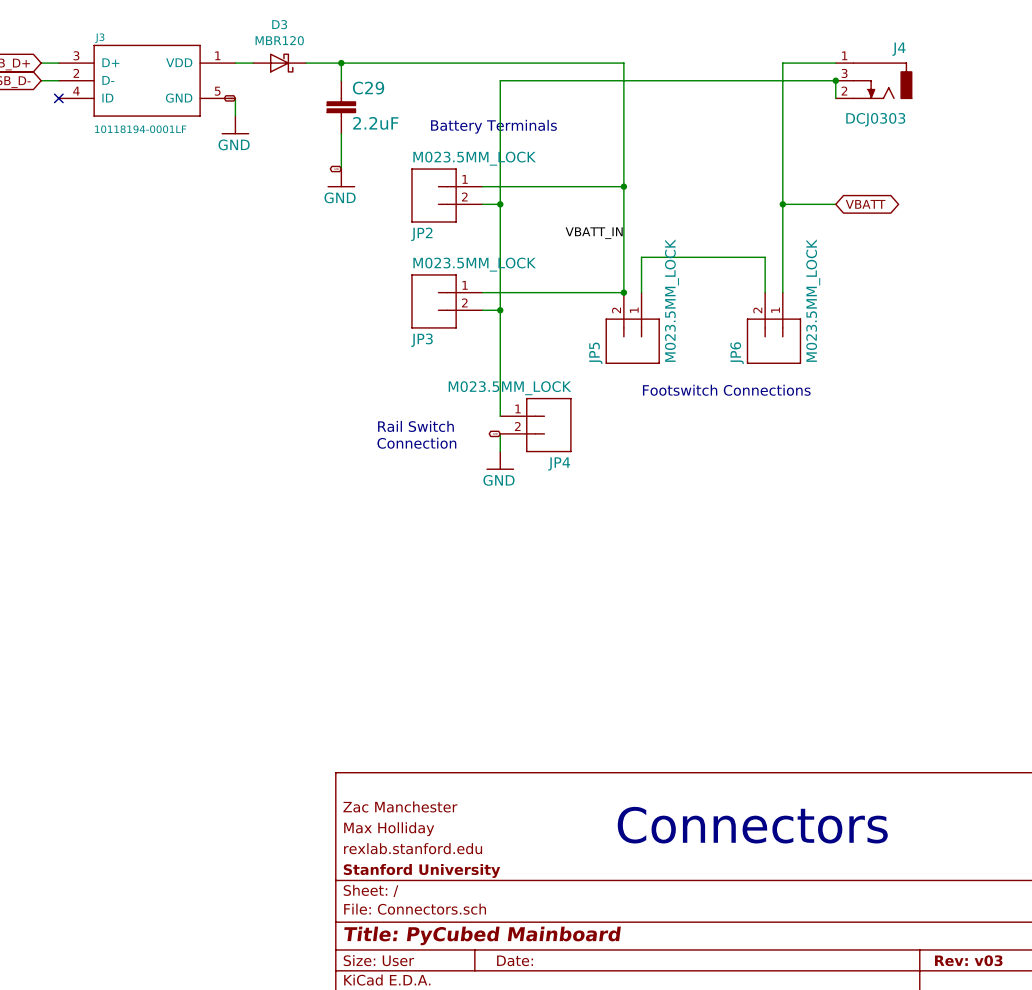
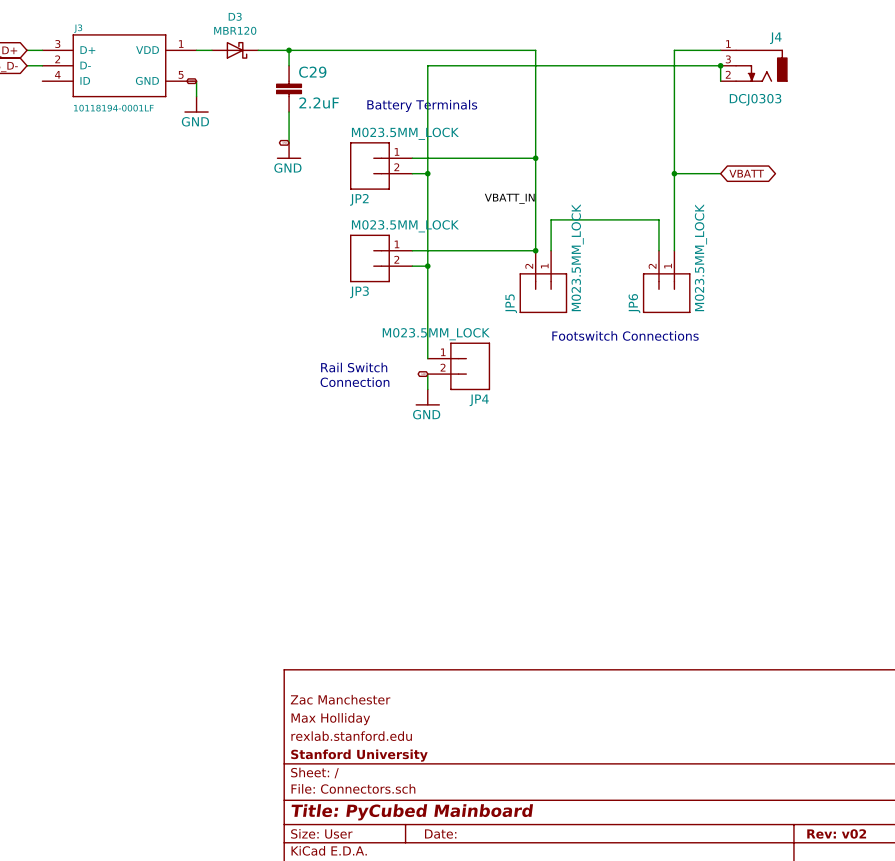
no-connect mark: (58, 98) -> none
text: Connectors (752, 825) -> none
title block: Rev: v03 (968, 960) -> Rev: v02 (836, 833)

